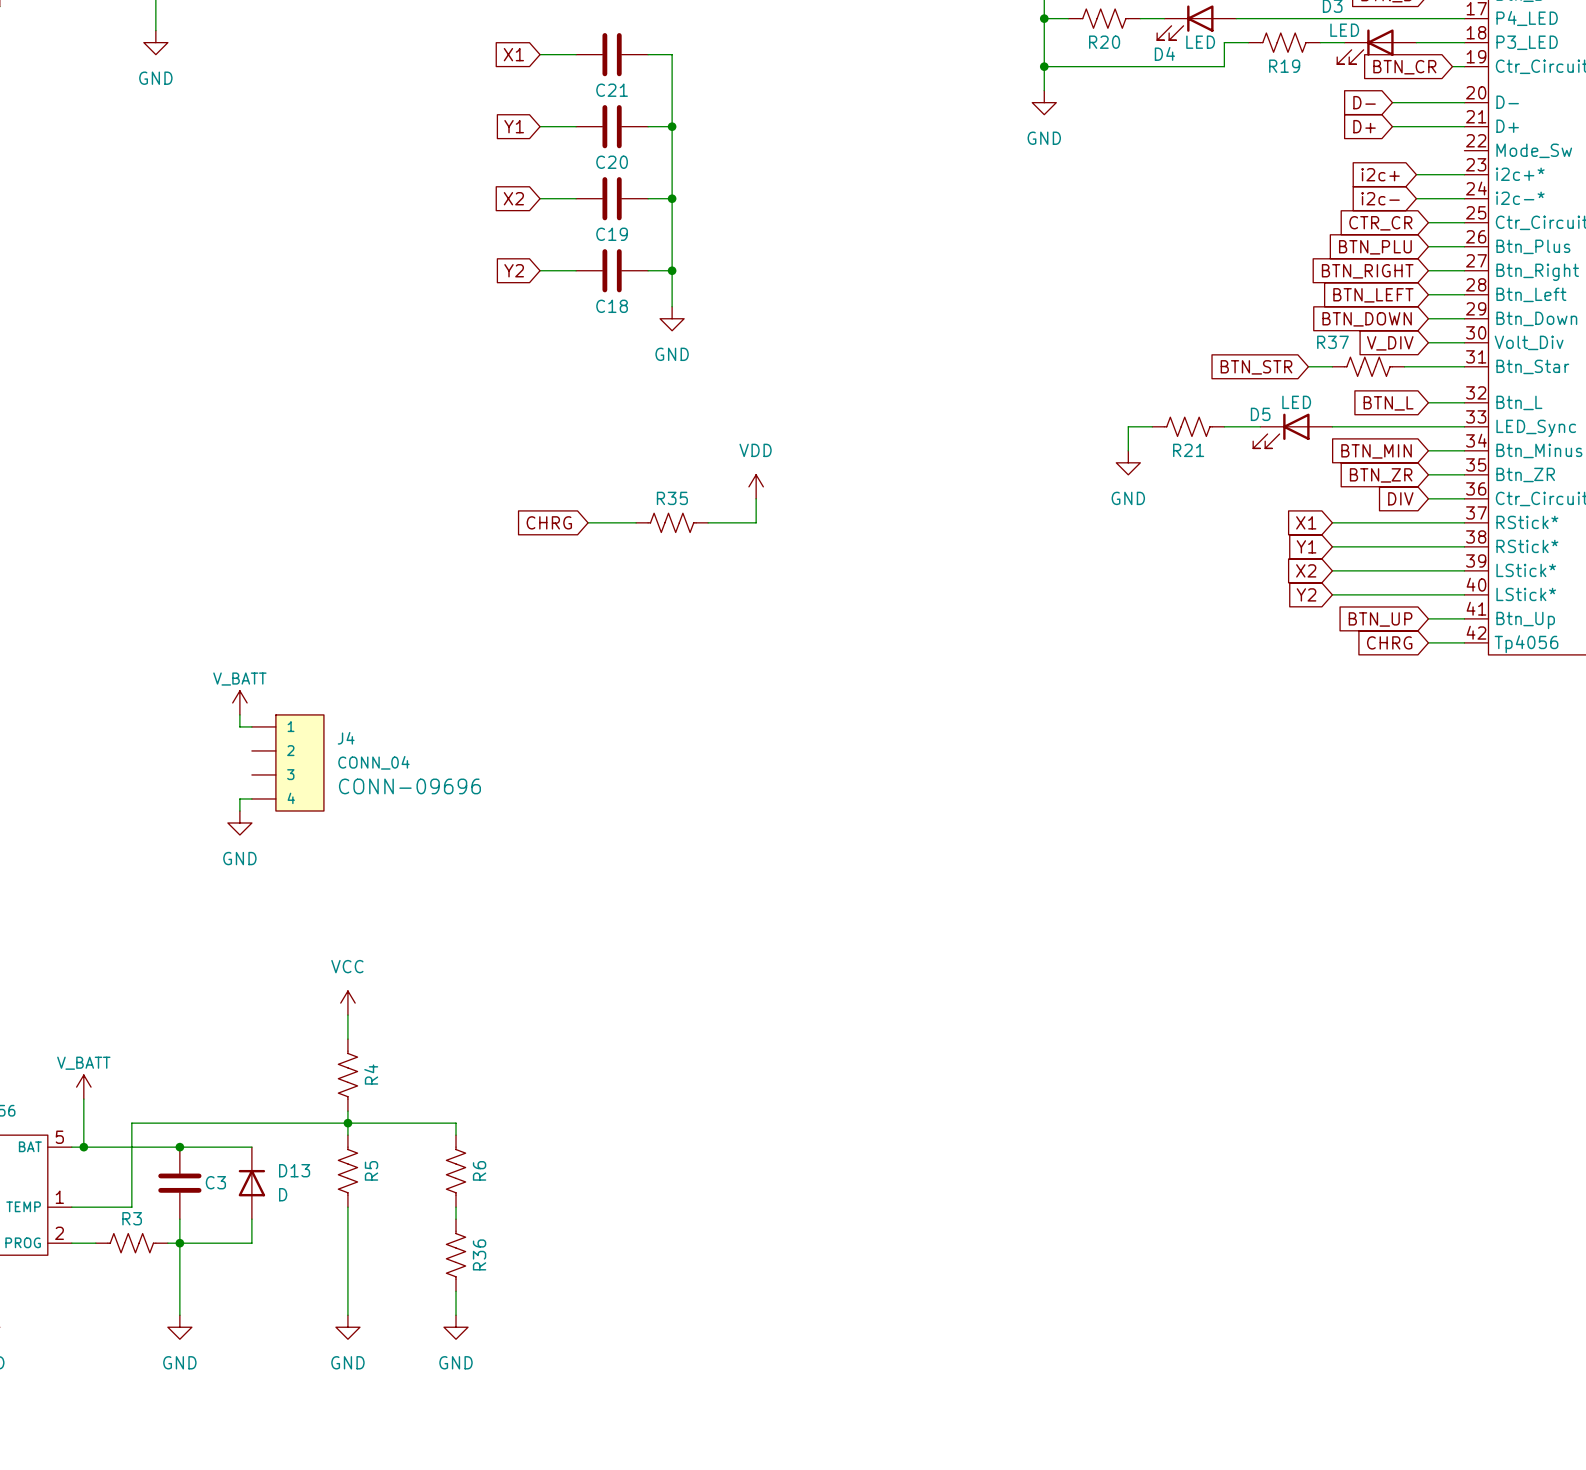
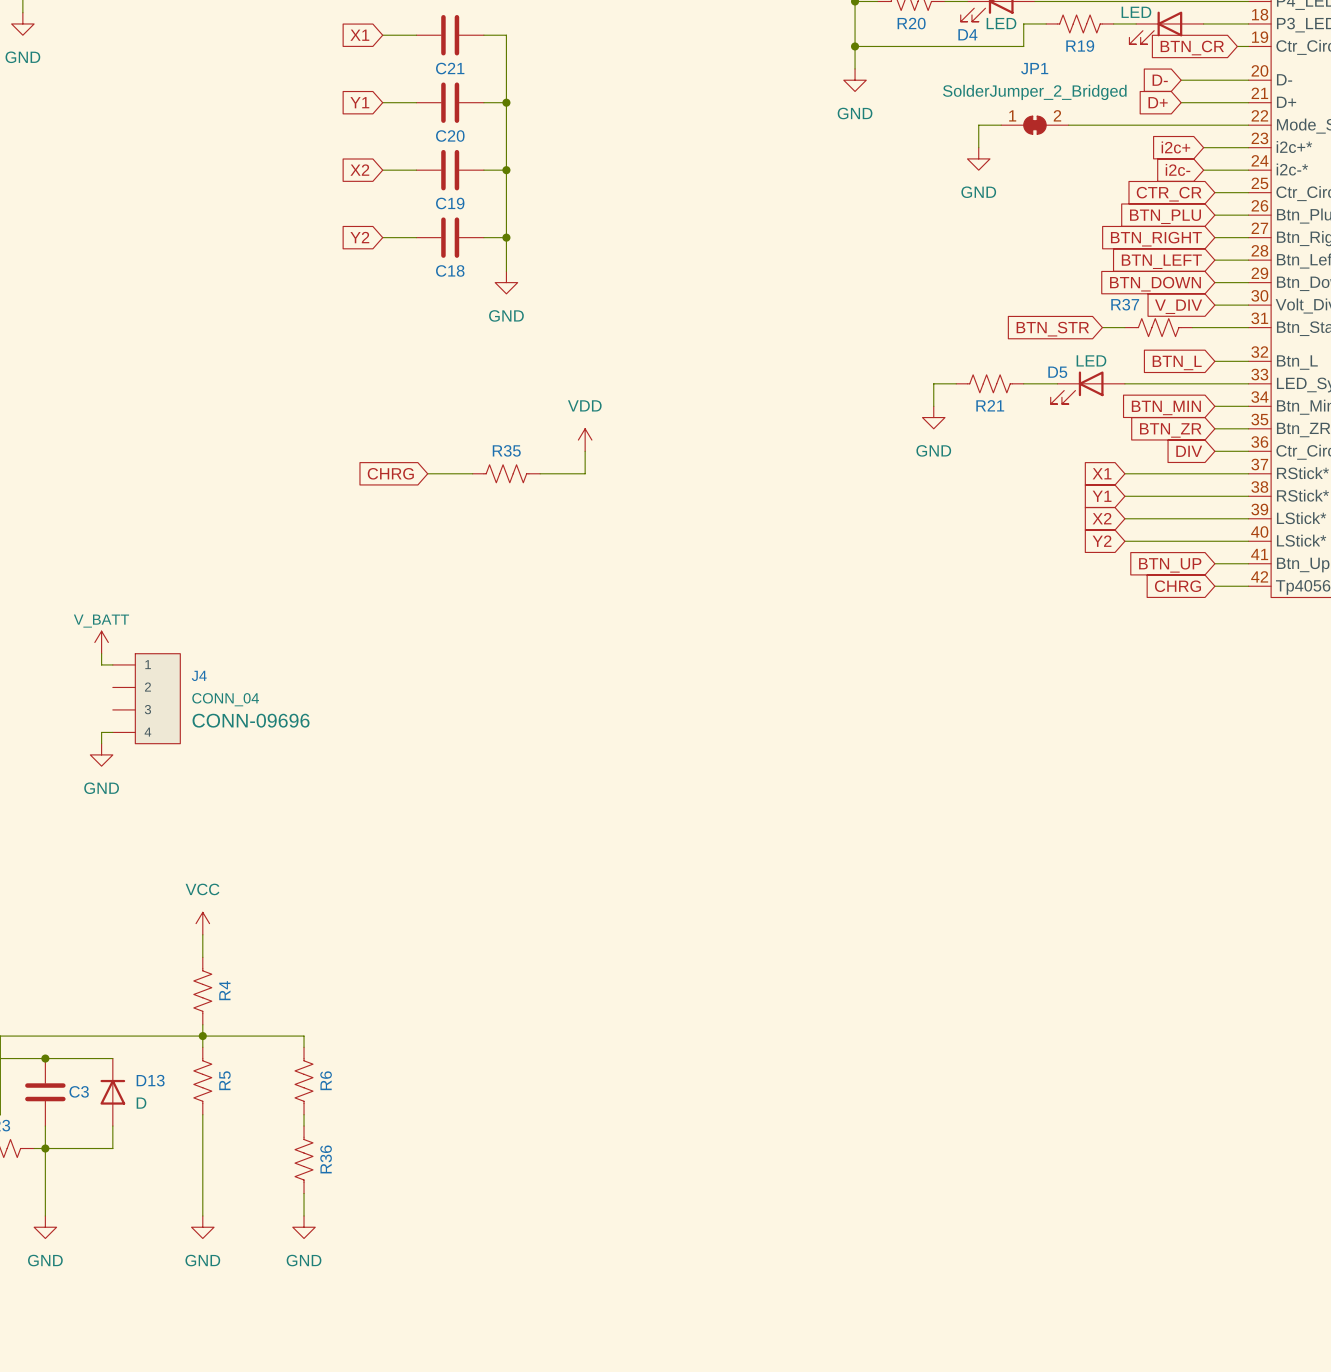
wire: none -> (1001, 125) (978, 125) (978, 147)
JP1: none -> SolderJumper_2_Bridged (1034, 125)
wire: none -> (1068, 125) (1248, 125)
power symbol: none -> GND (978, 158)

